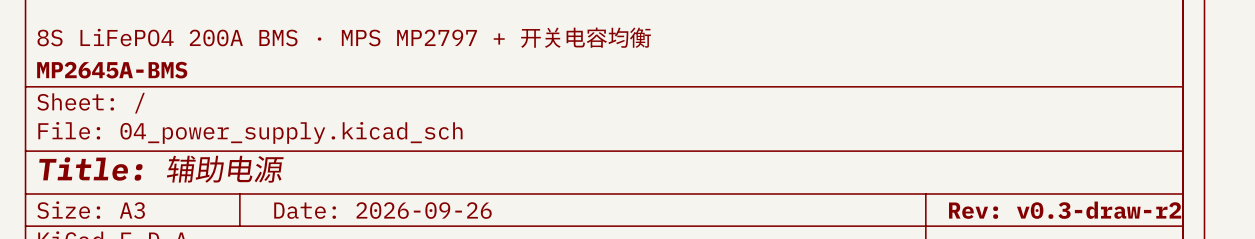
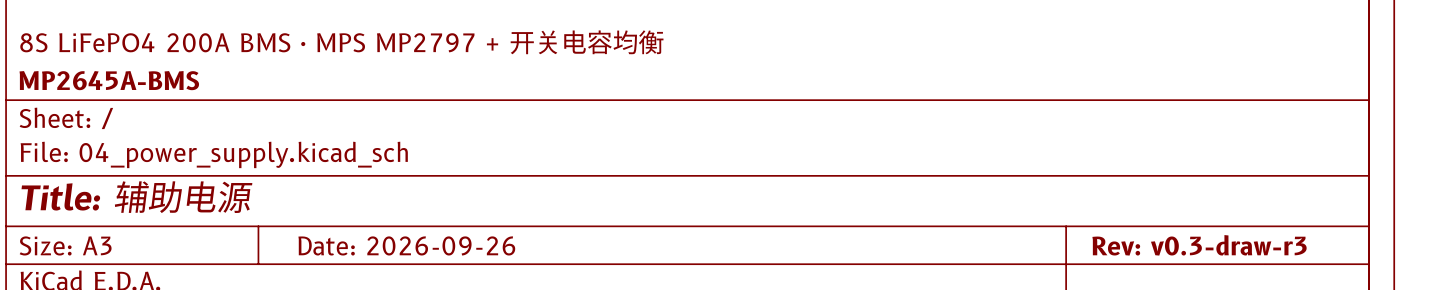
title block: Rev: v0.3-draw-r2 (1065, 210) -> Rev: v0.3-draw-r3 (1199, 245)

